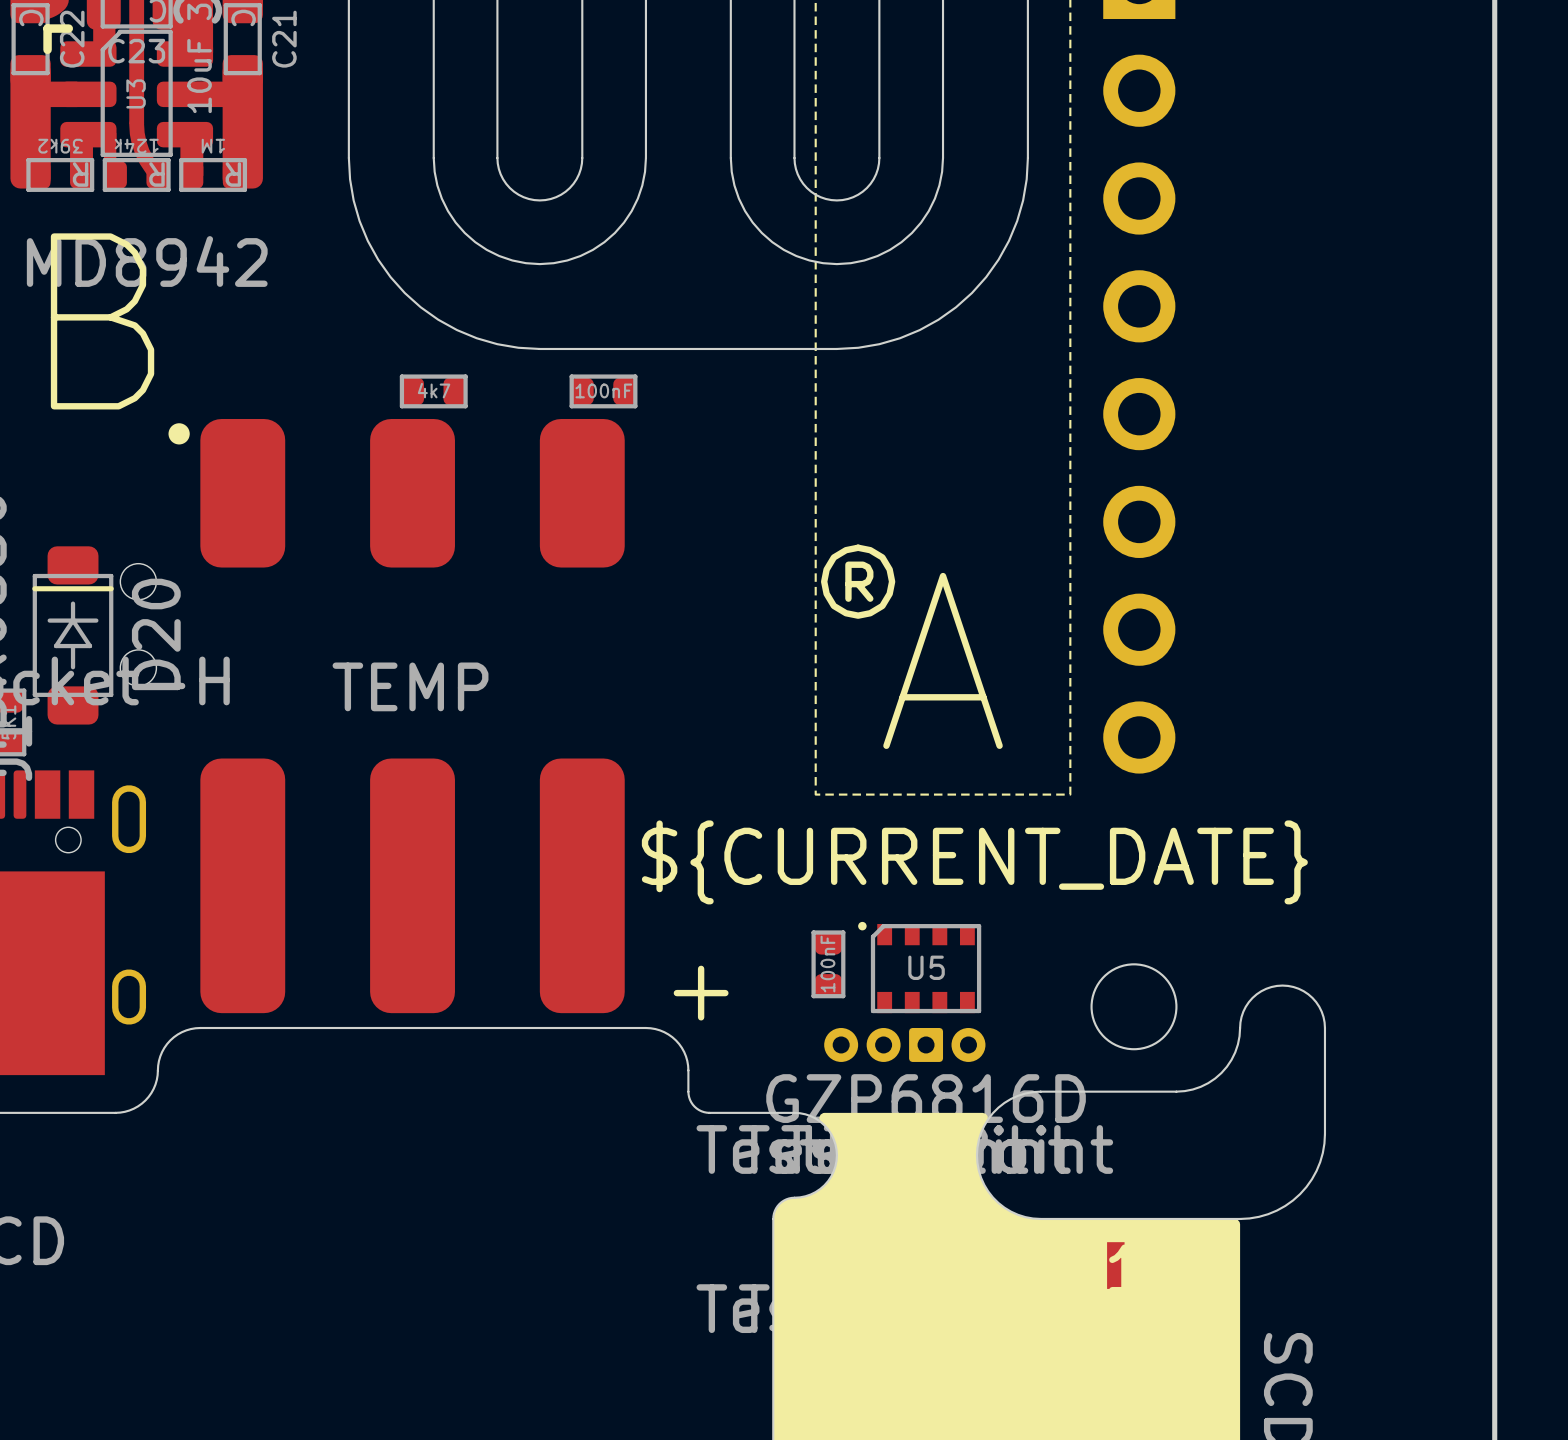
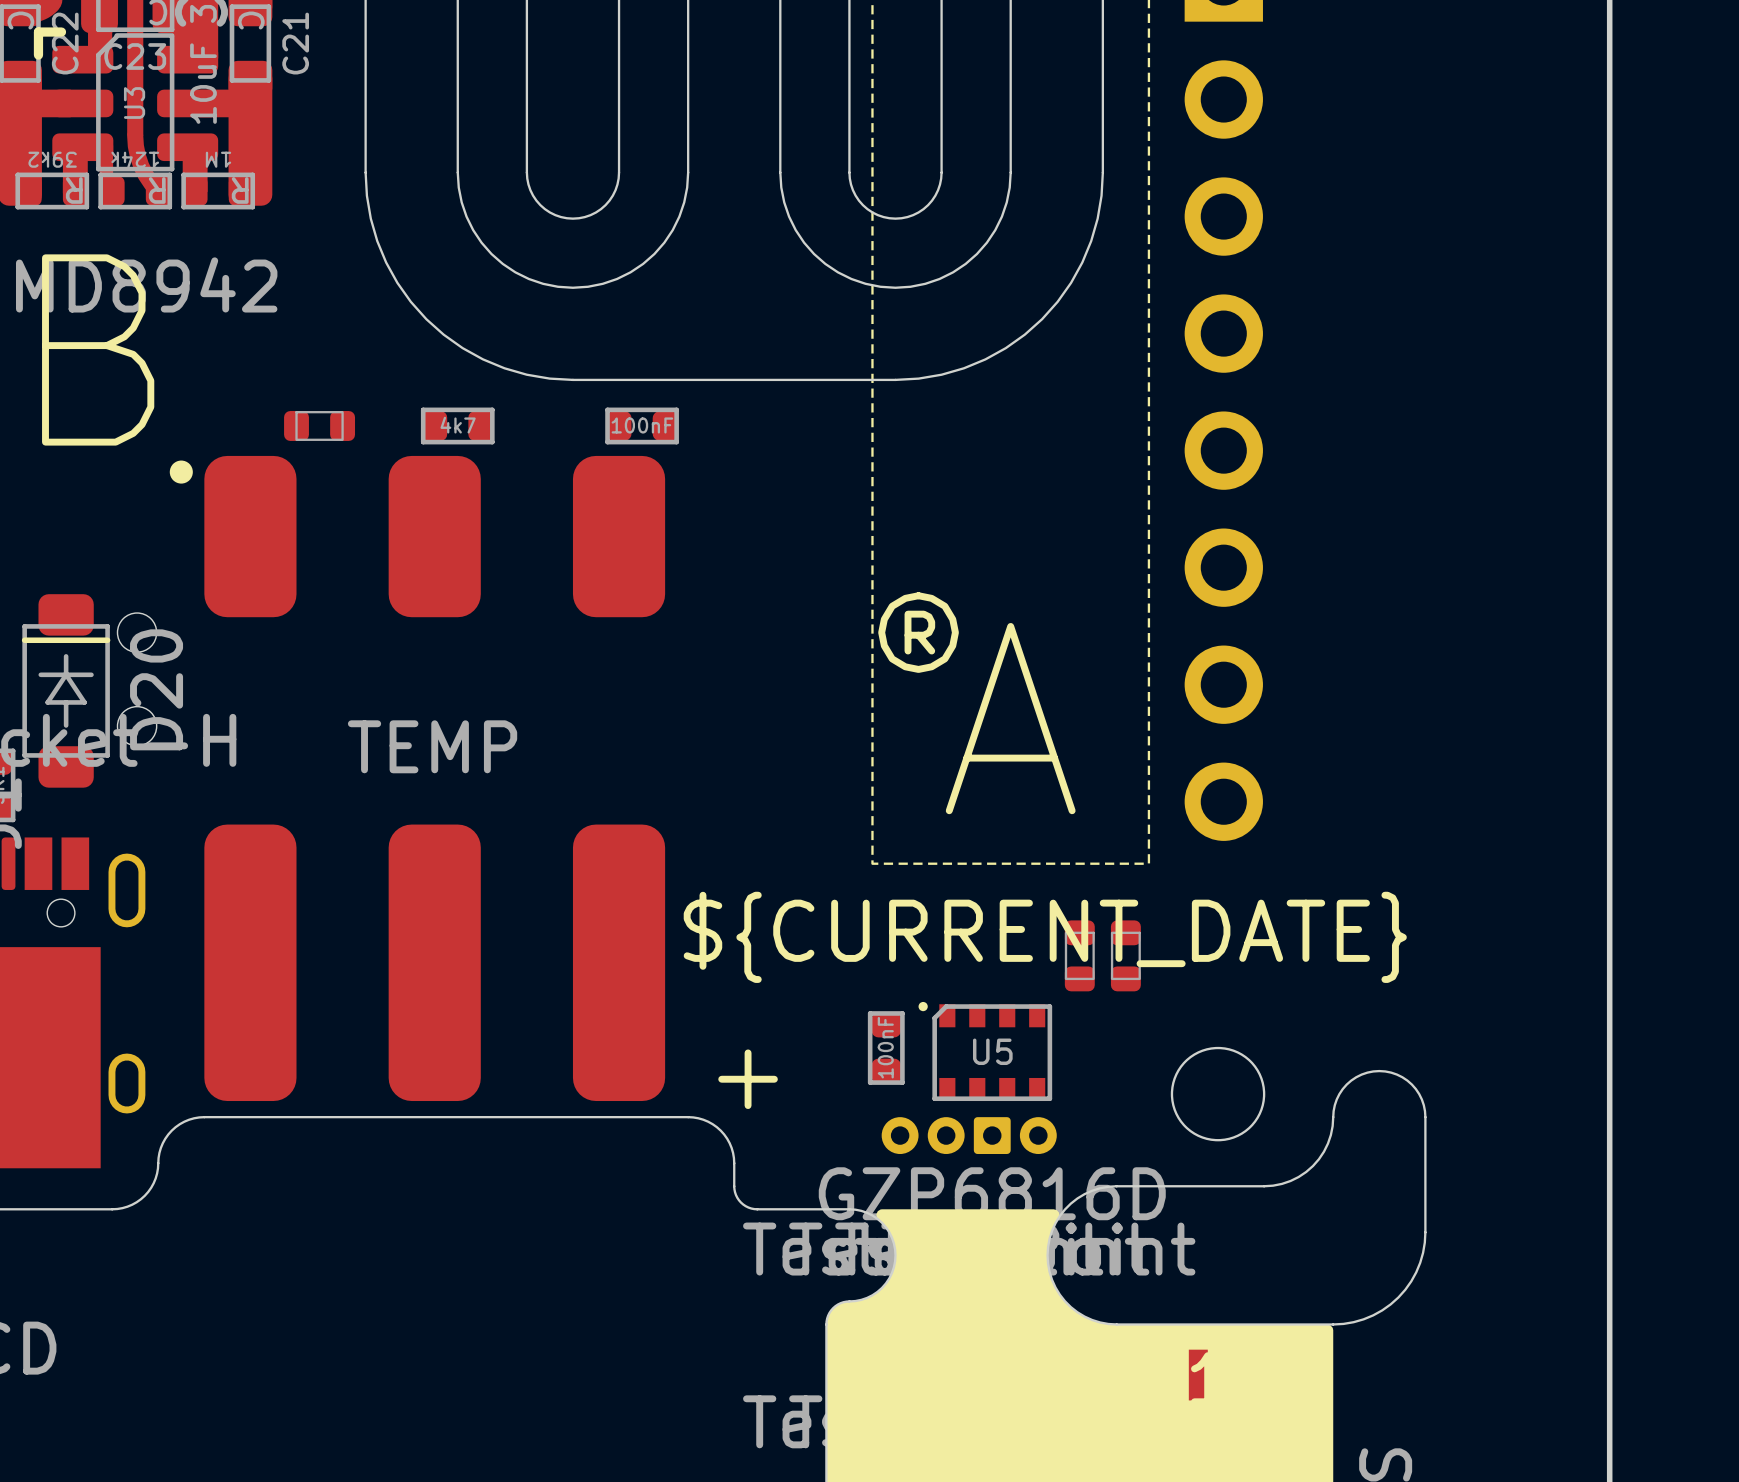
part: none -> (319, 425)
part: none -> (1079, 955)
part: none -> (1125, 955)

